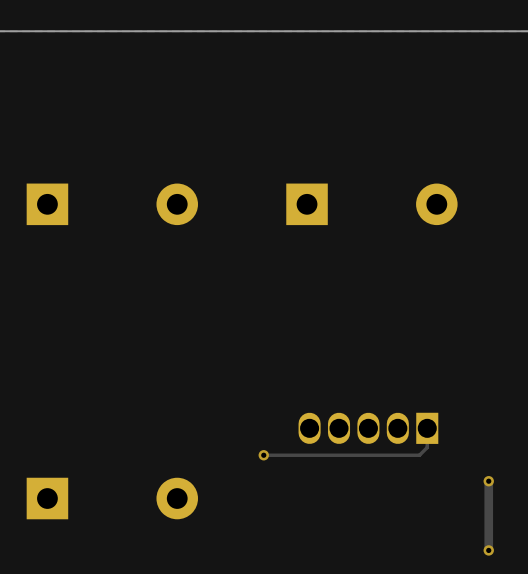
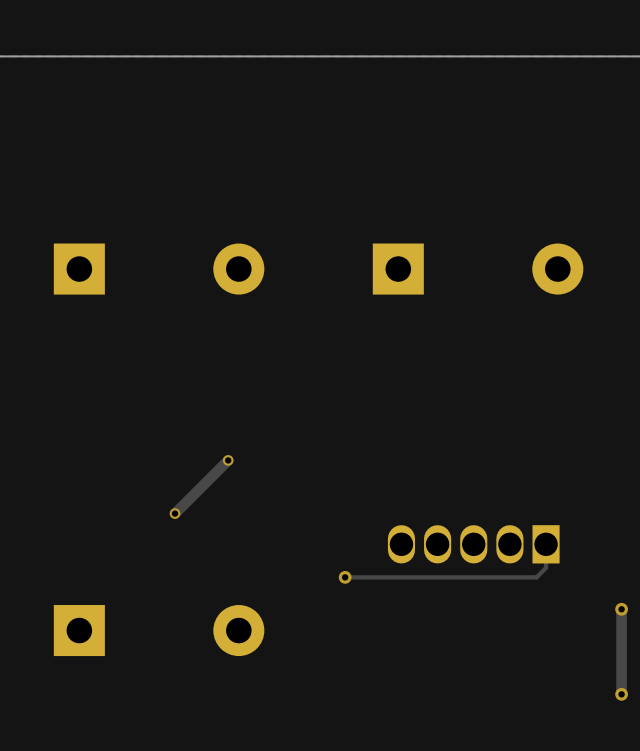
track: none -> (228, 460) (175, 513)
via: none -> (228, 460)
via: none -> (175, 513)

